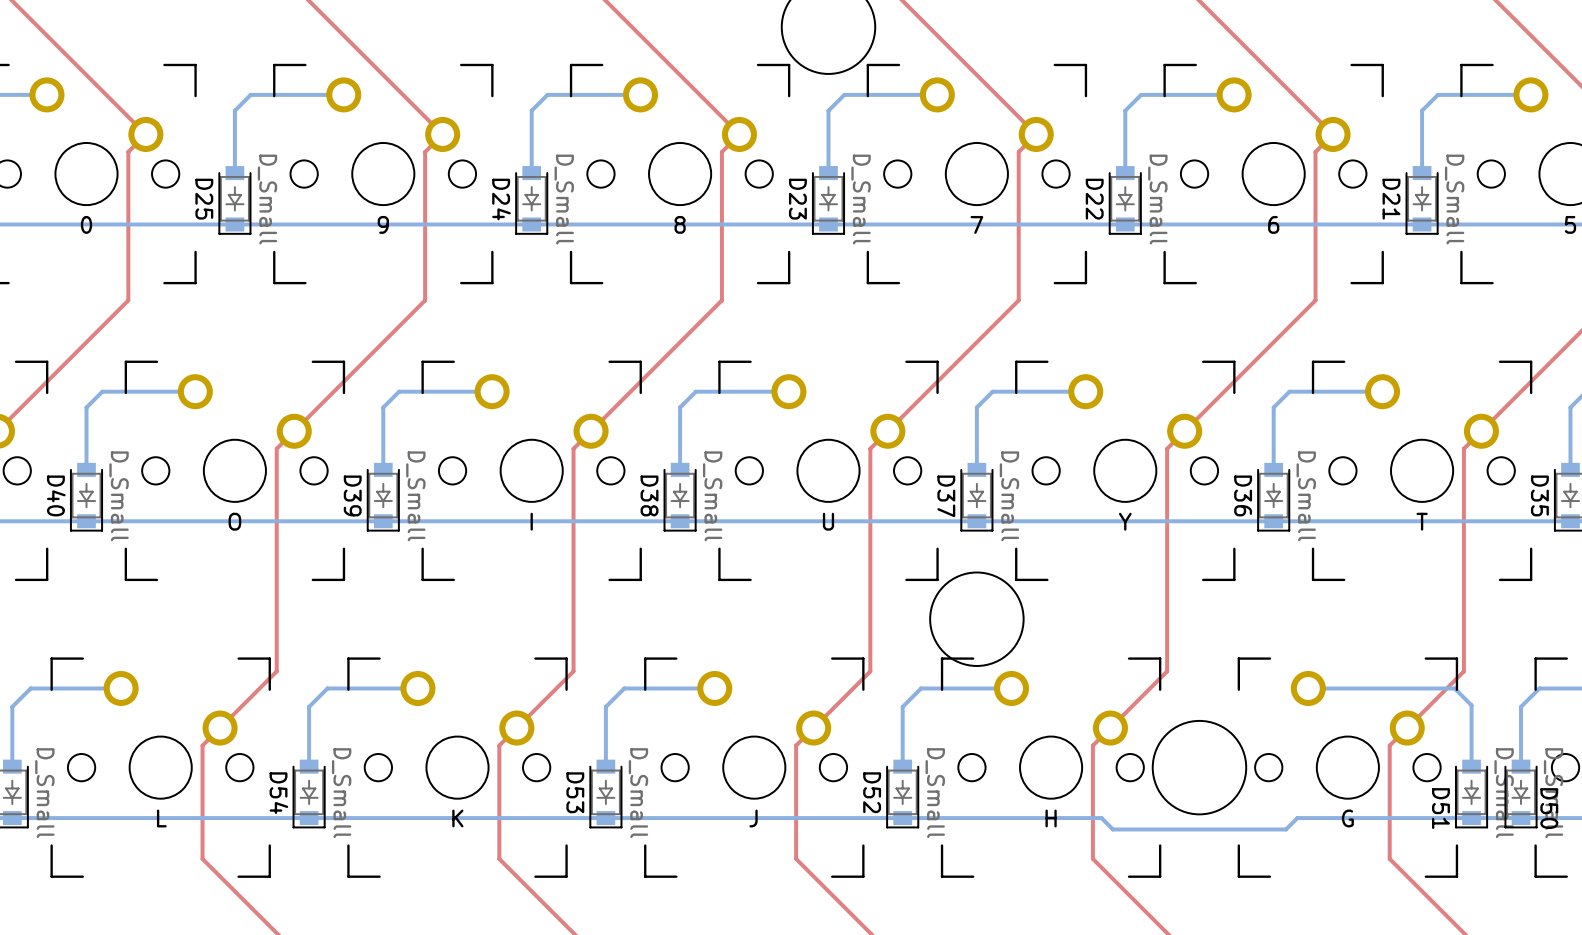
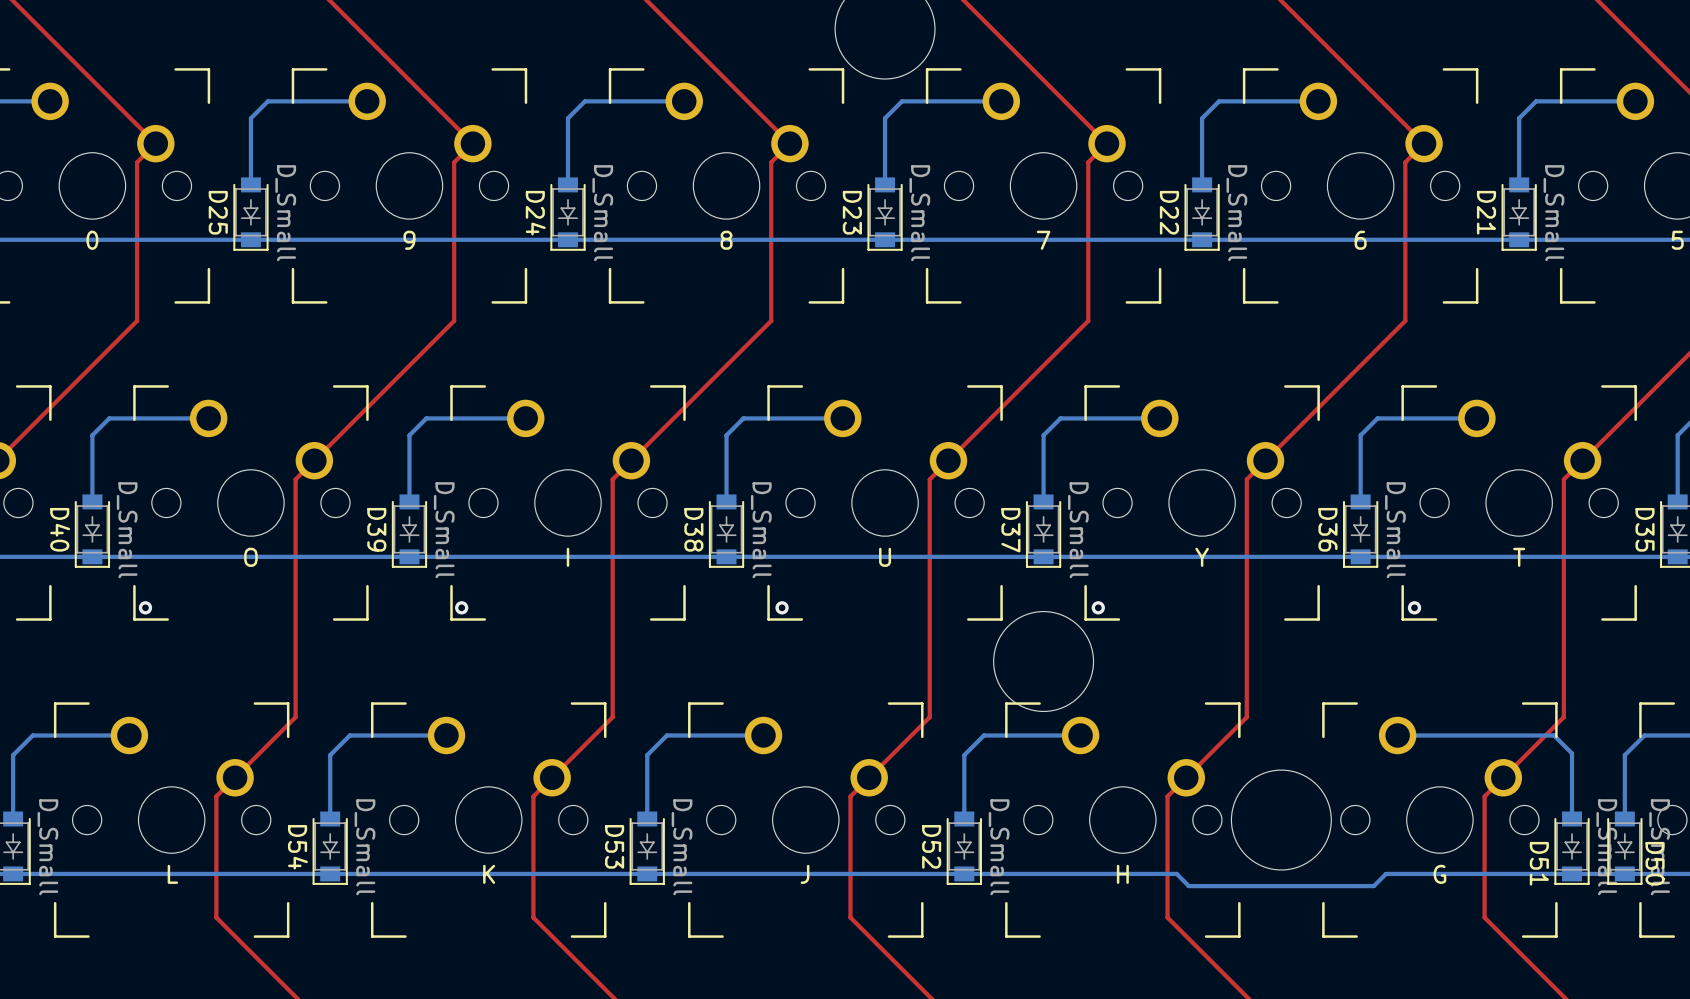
via: none -> (145, 607)
via: none -> (461, 607)
via: none -> (782, 607)
via: none -> (1098, 607)
via: none -> (1414, 607)

